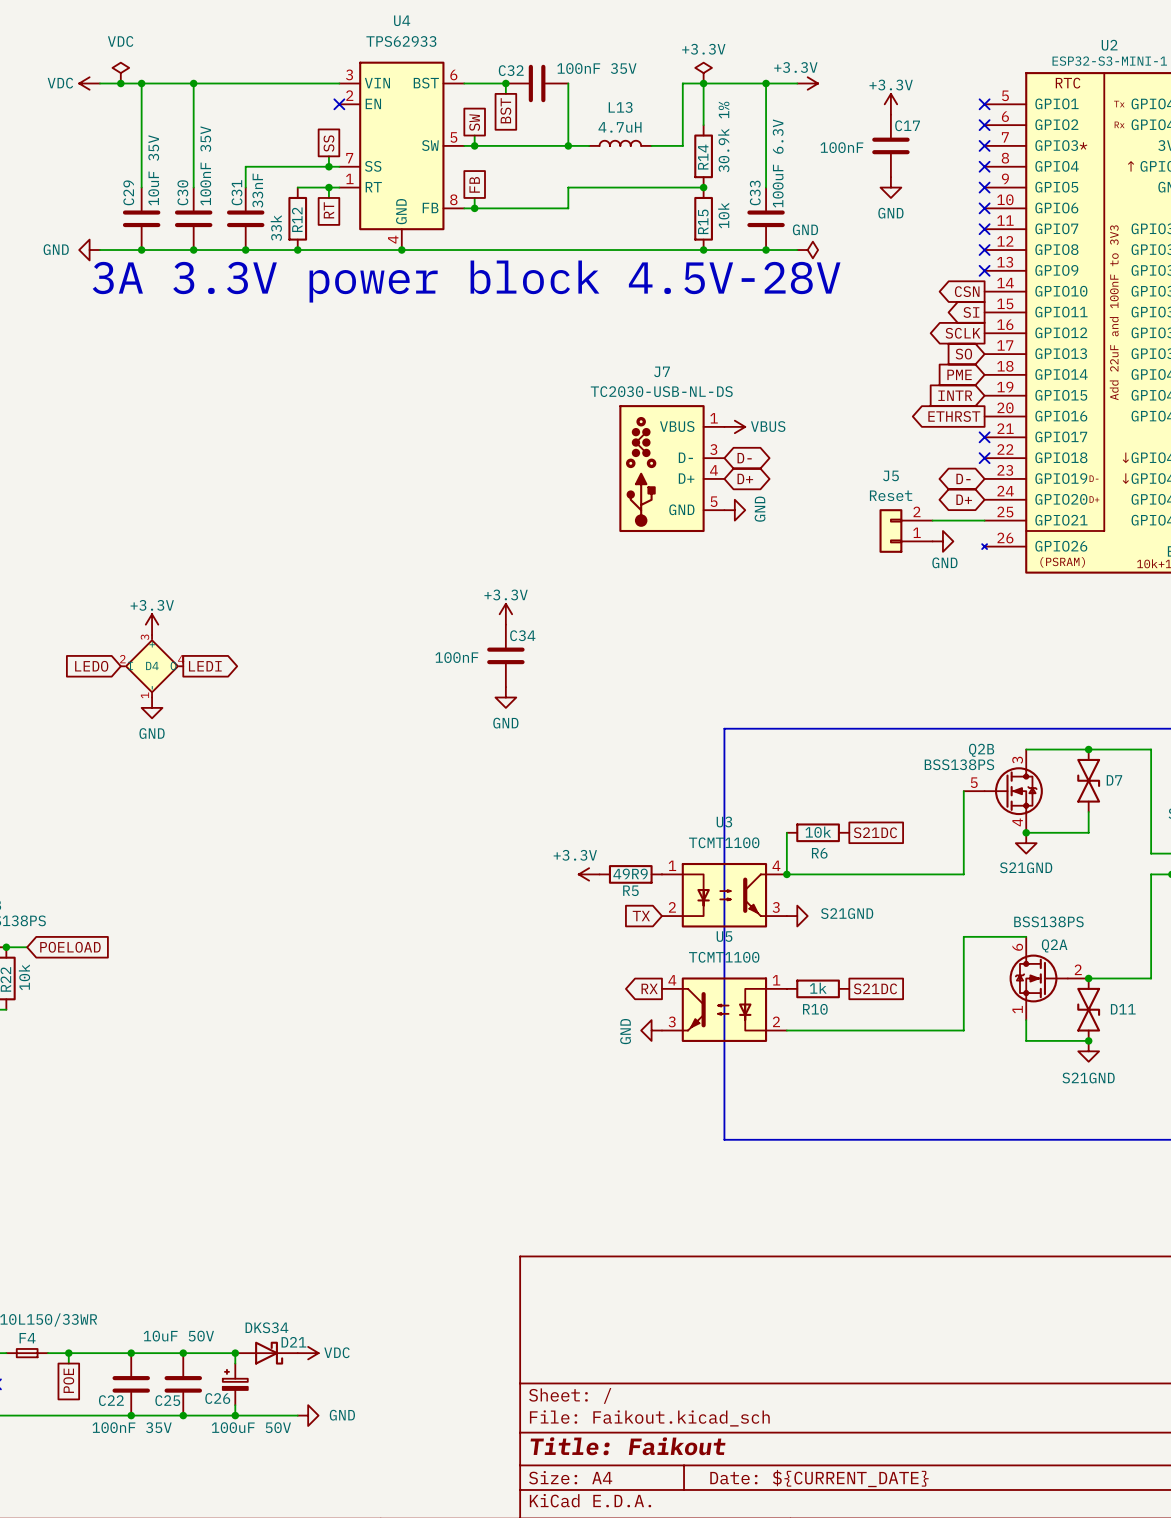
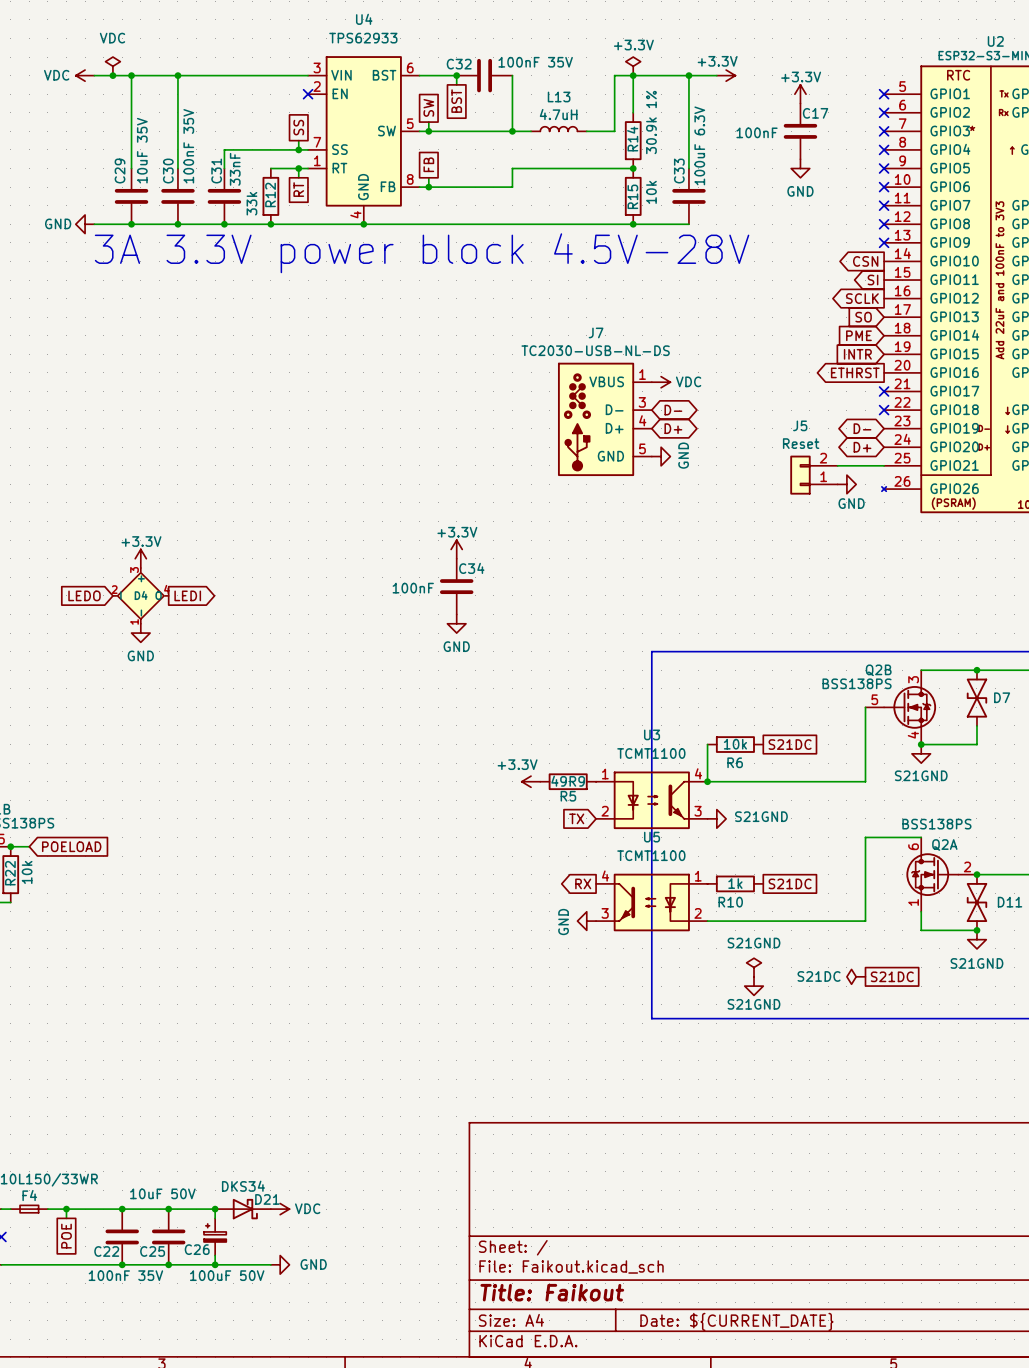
wire: (766, 250) (797, 250) -> none
junction: (766, 250) -> none
power symbol: GND (807, 250) -> none
power symbol: VBUS (734, 426) -> VDC (661, 382)
power symbol: none -> S21GND (754, 967)
power symbol: none -> S21DC (856, 976)
global label: none -> S21DC (892, 976)
power symbol: none -> S21GND (754, 986)

